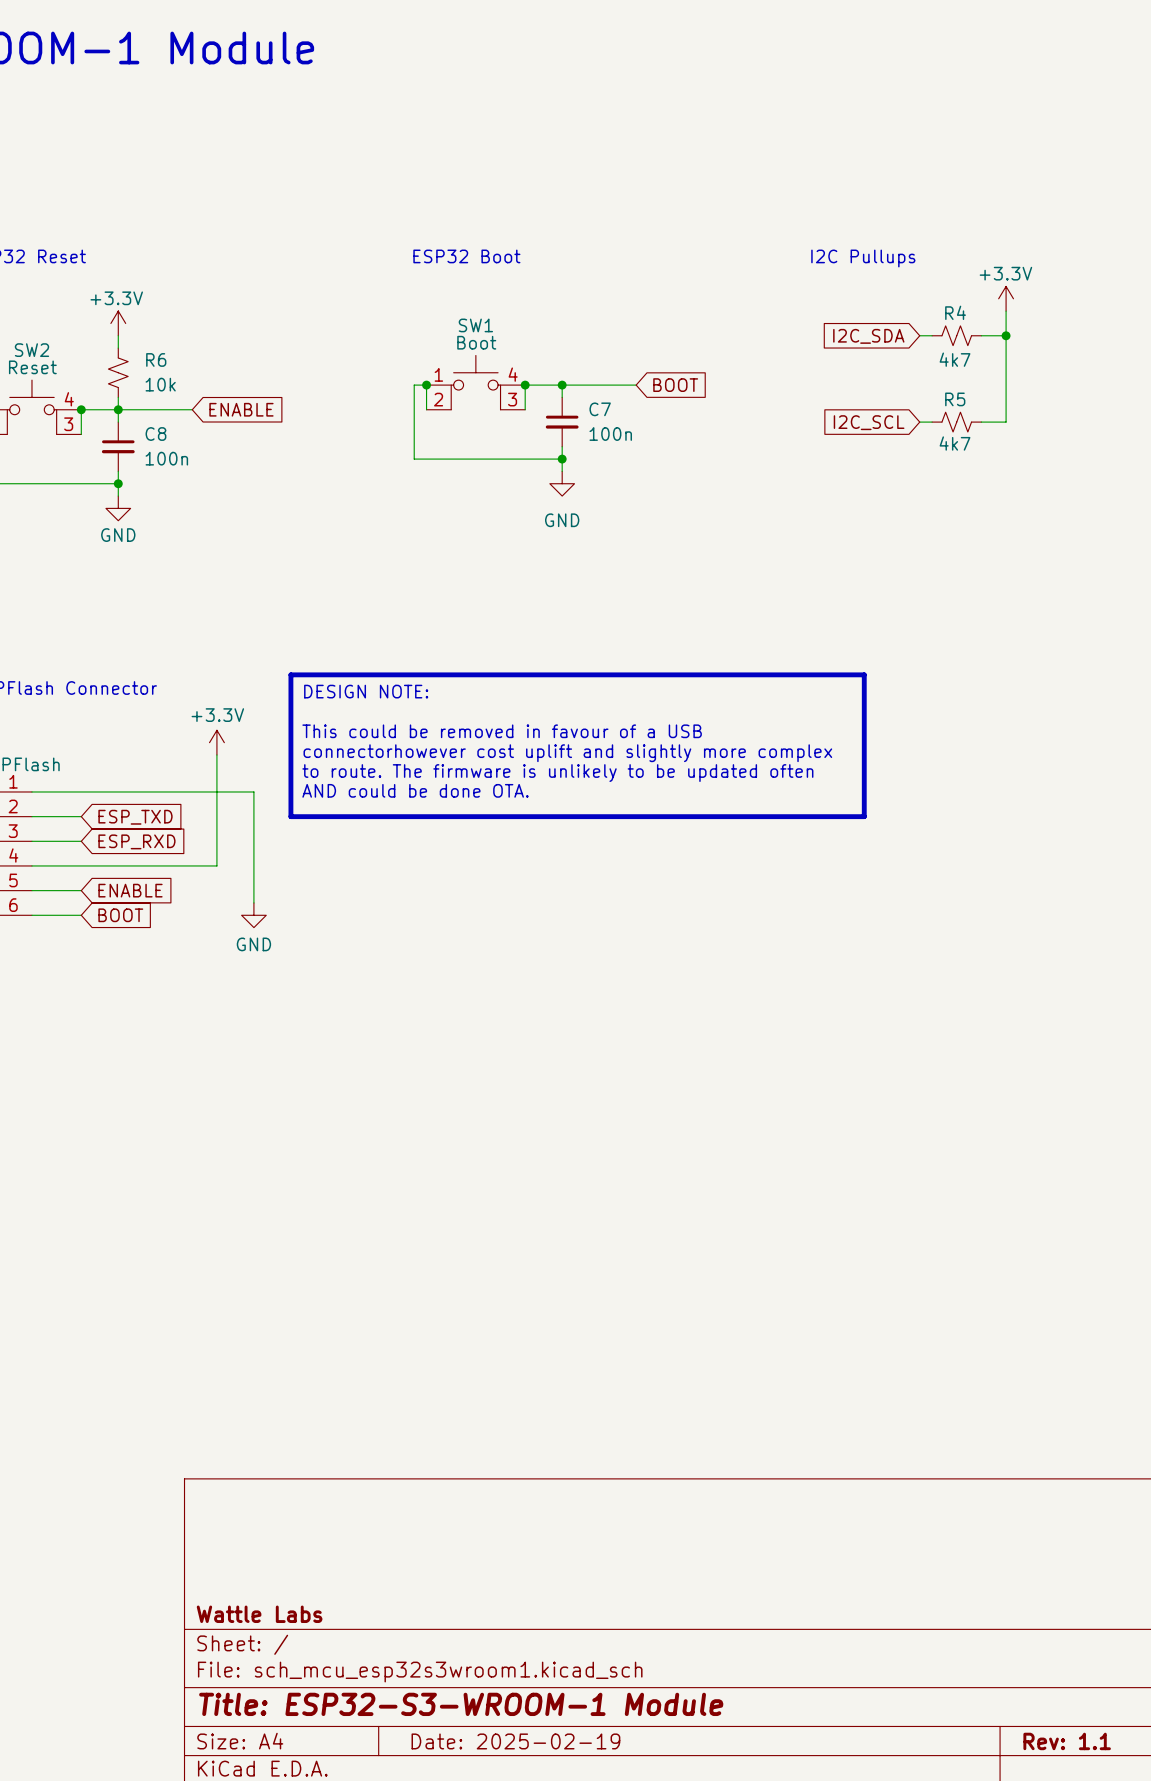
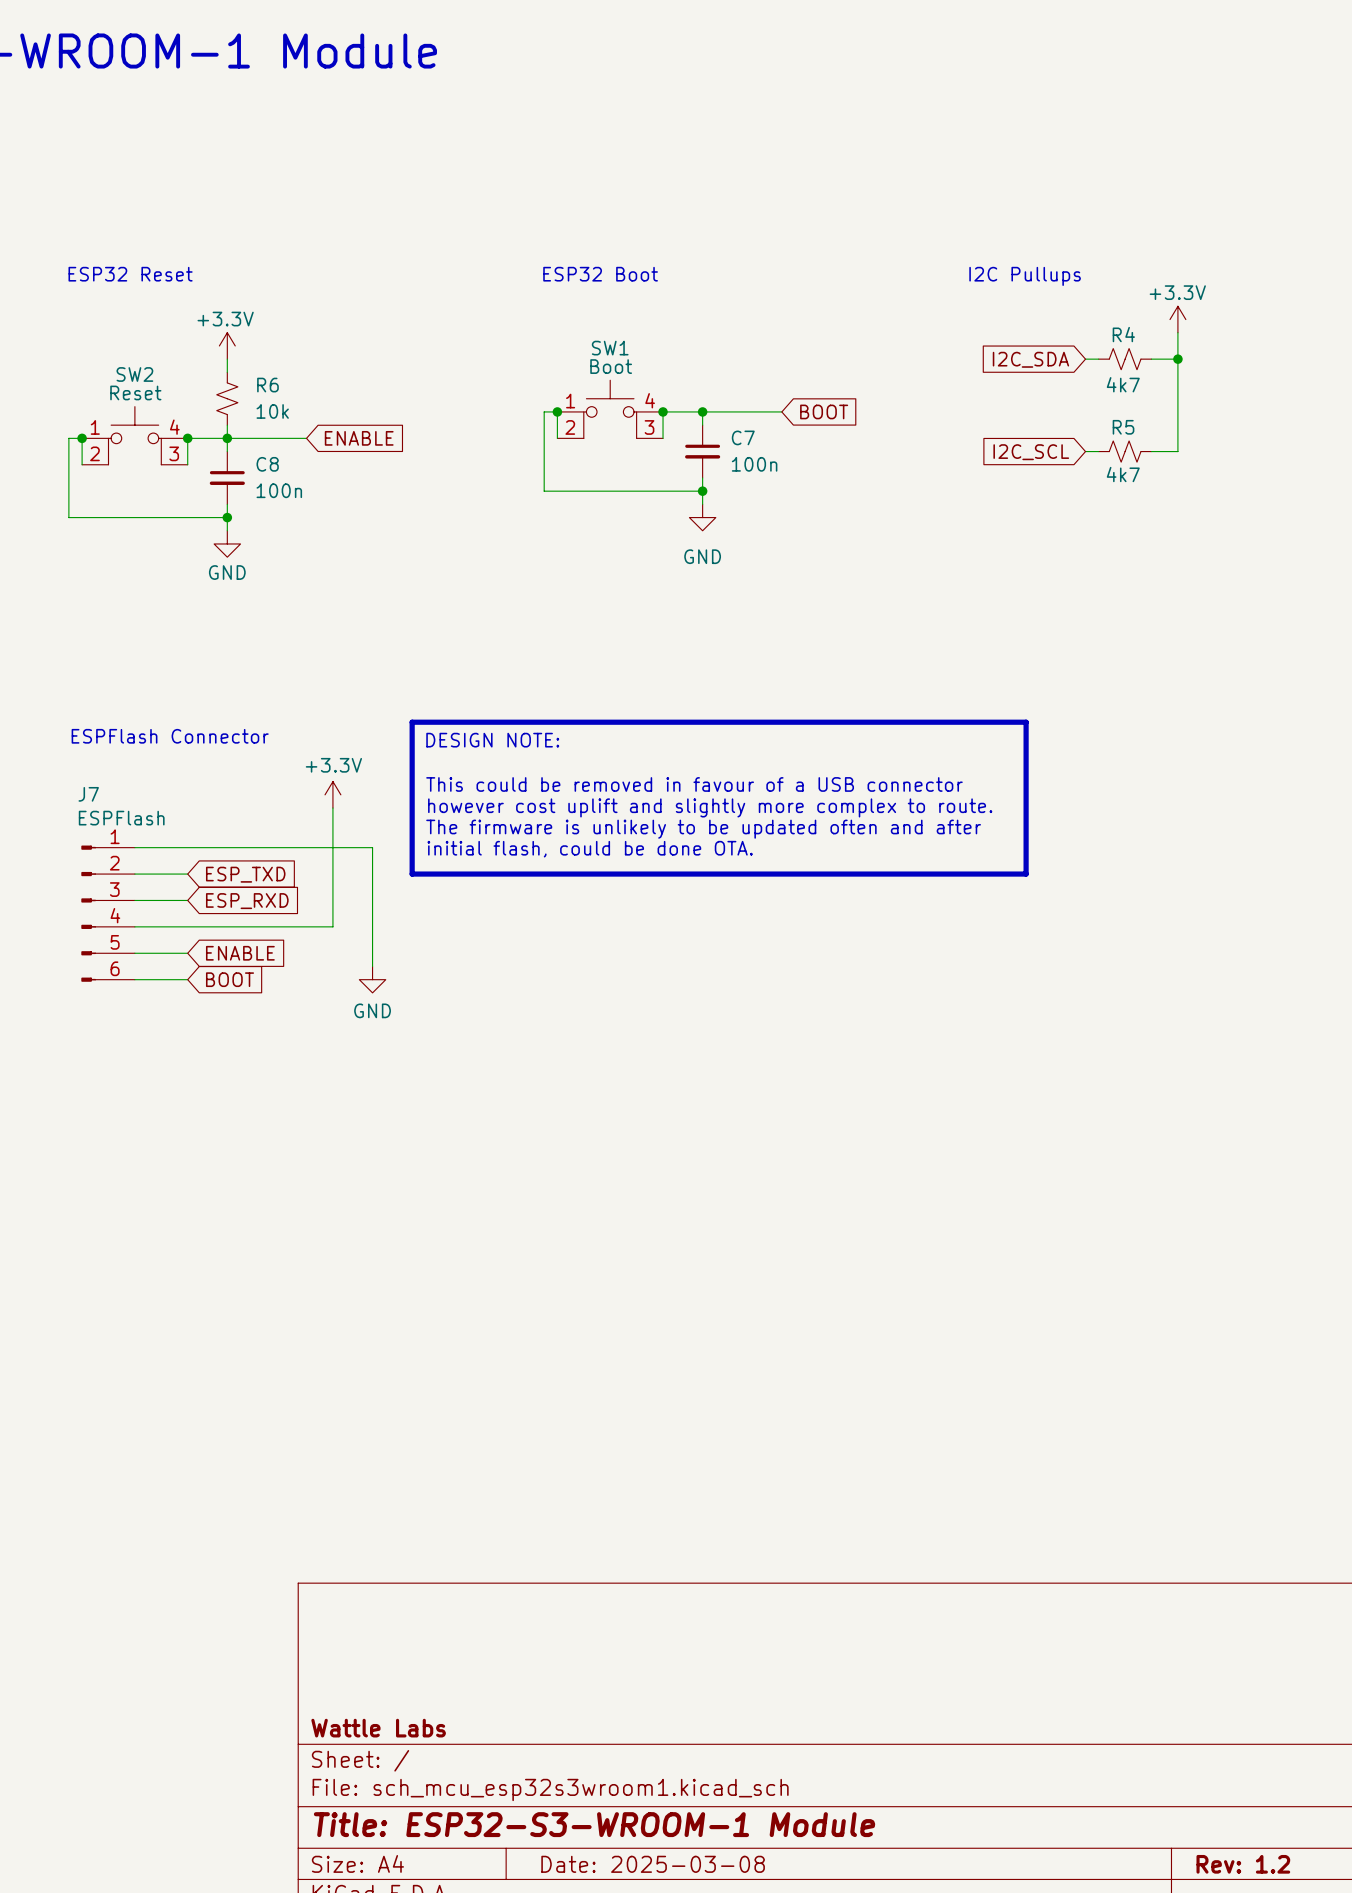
text: This could be removed in favour of a USB (502, 731) -> This could be removed in favour of a USB connector (694, 784)
text: connectorhowever cost uplift and slightly more complex (567, 753) -> however cost uplift and slightly more complex to route. (710, 807)
text: to route. The firmware is unlikely to be updated often (557, 773) -> The firmware is unlikely to be updated often and after (703, 829)
text: AND could be done OTA. (415, 790) -> initial flash, could be done OTA. (590, 849)
title block: Date: 2025-02-19 (515, 1741) -> Date: 2025-03-08 (653, 1864)
title block: Rev: 1.1 (1067, 1741) -> Rev: 1.2 (1243, 1864)

